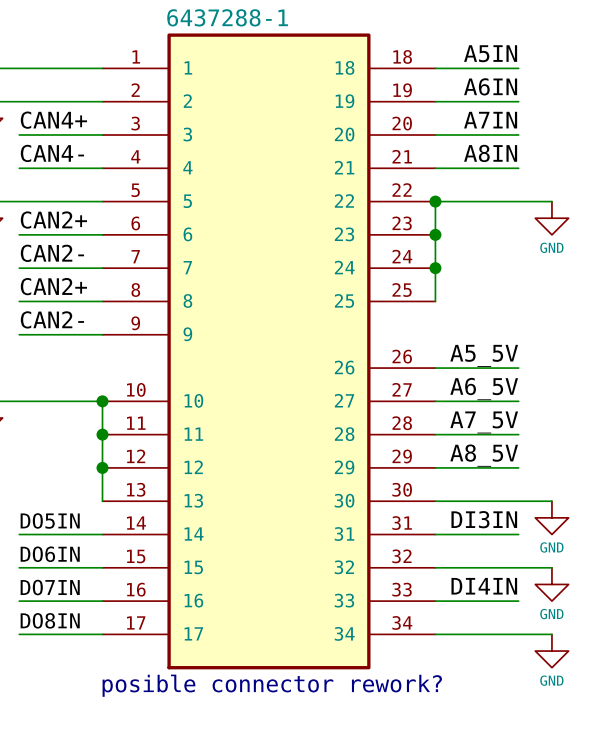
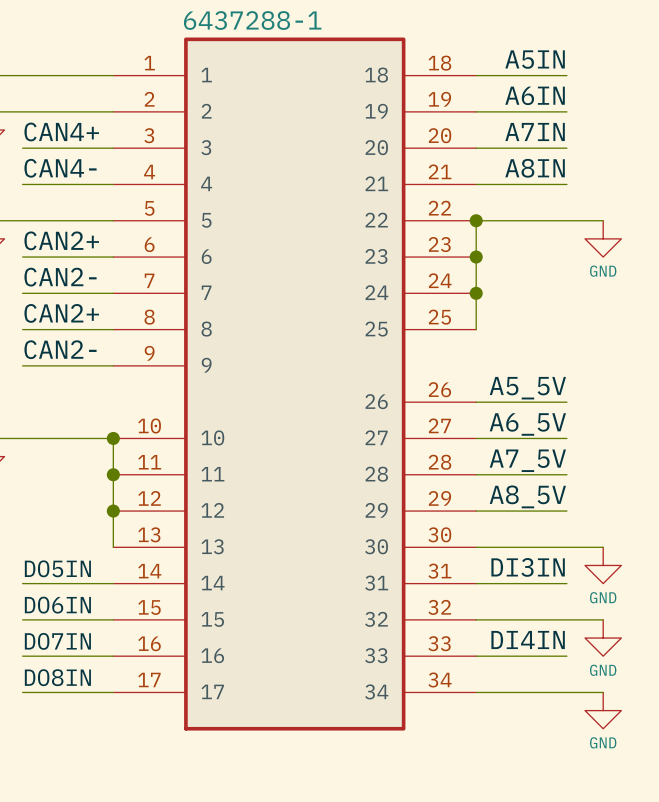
text: posible connector rework? (272, 685) -> none

